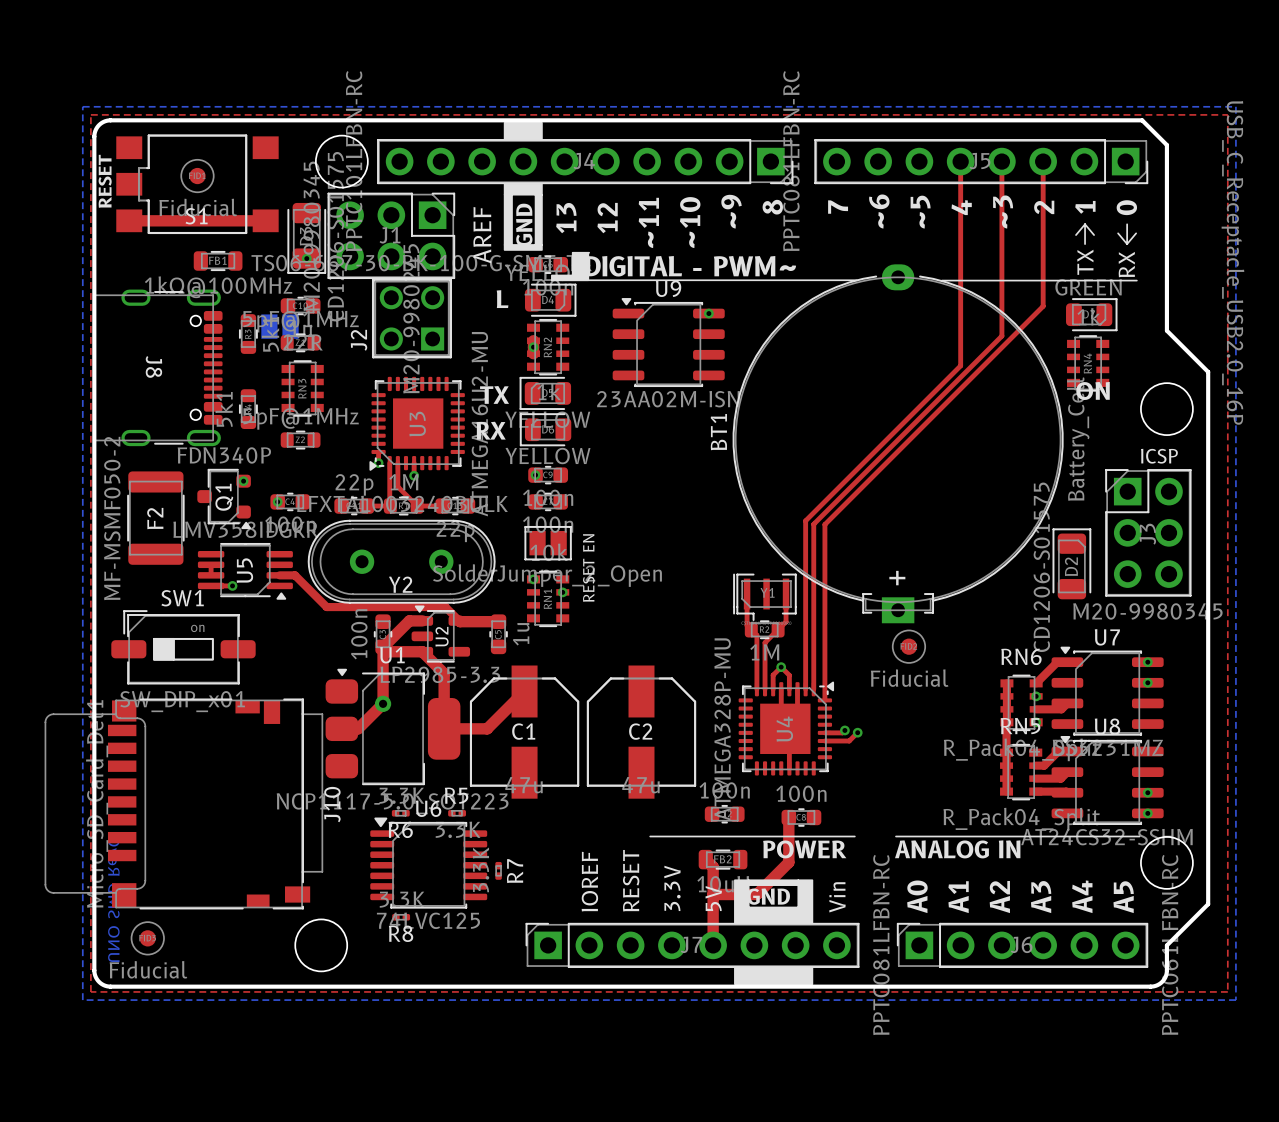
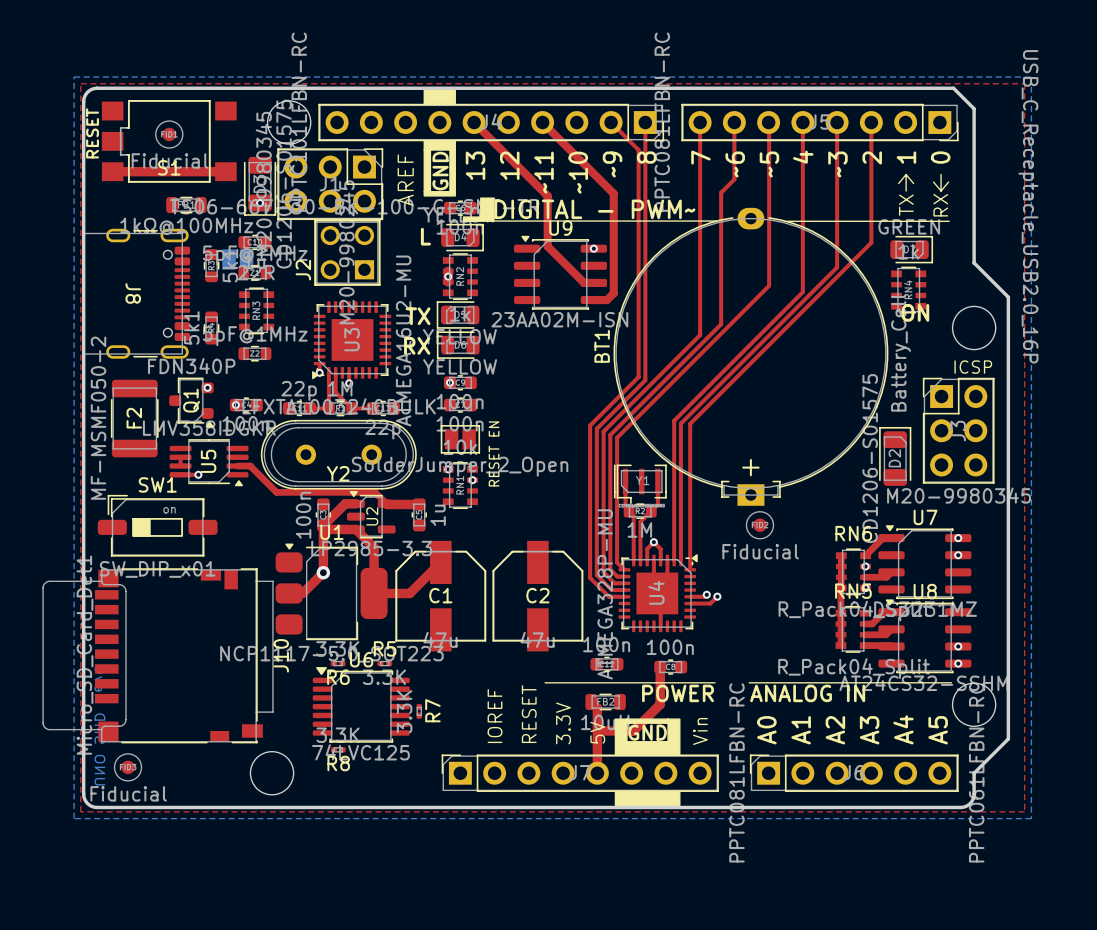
top track: none -> (474, 122) (547, 196) (547, 246) (584, 282) (593, 282)
top track: none -> (542, 122) (613, 193) (613, 293) (607, 300) (593, 300)
top track: none -> (611, 122) (638, 150) (638, 377) (590, 425) (590, 577) (609, 596) (624, 596)
top track: none -> (645, 122) (645, 380) (596, 428) (596, 575) (611, 590) (624, 590)
top track: none -> (700, 122) (700, 335) (603, 431) (603, 572) (614, 583) (624, 583)
top track: none -> (734, 122) (734, 179) (721, 192) (721, 324) (610, 435) (610, 569) (617, 576) (624, 576)
top track: none -> (768, 122) (769, 285) (617, 437) (617, 562) (624, 569)

